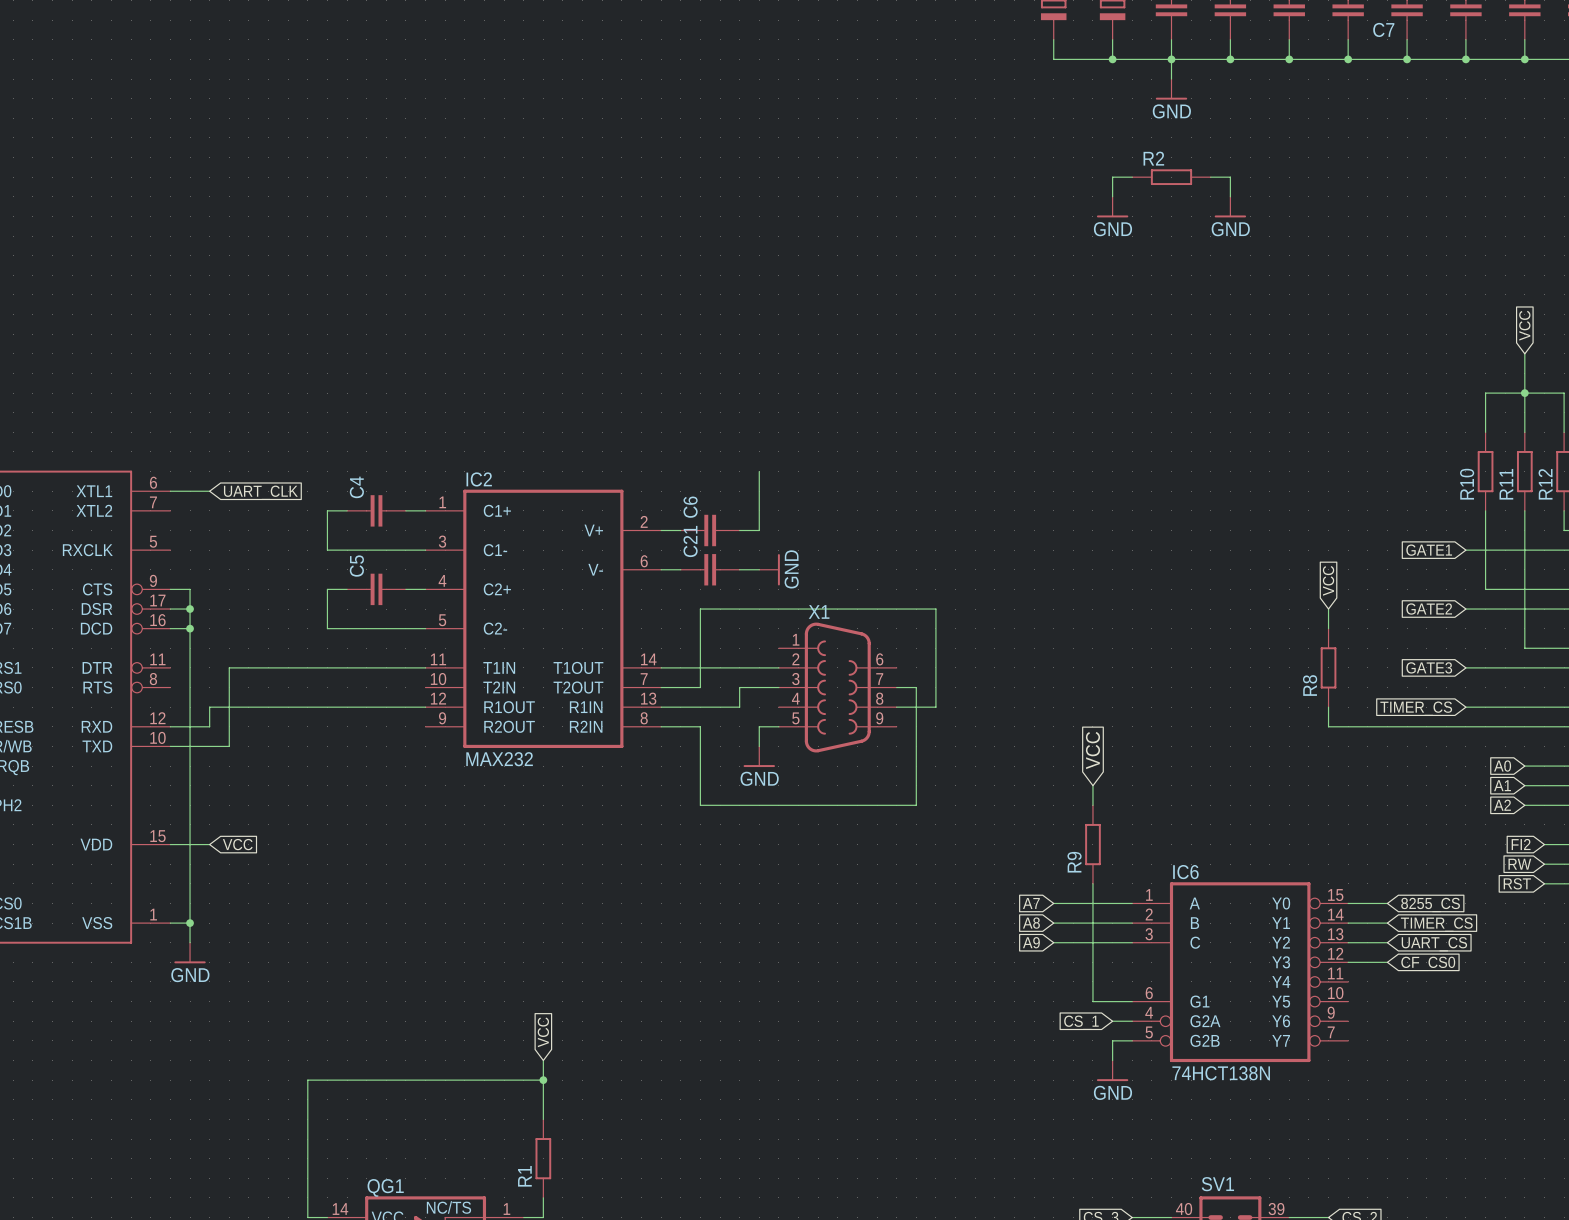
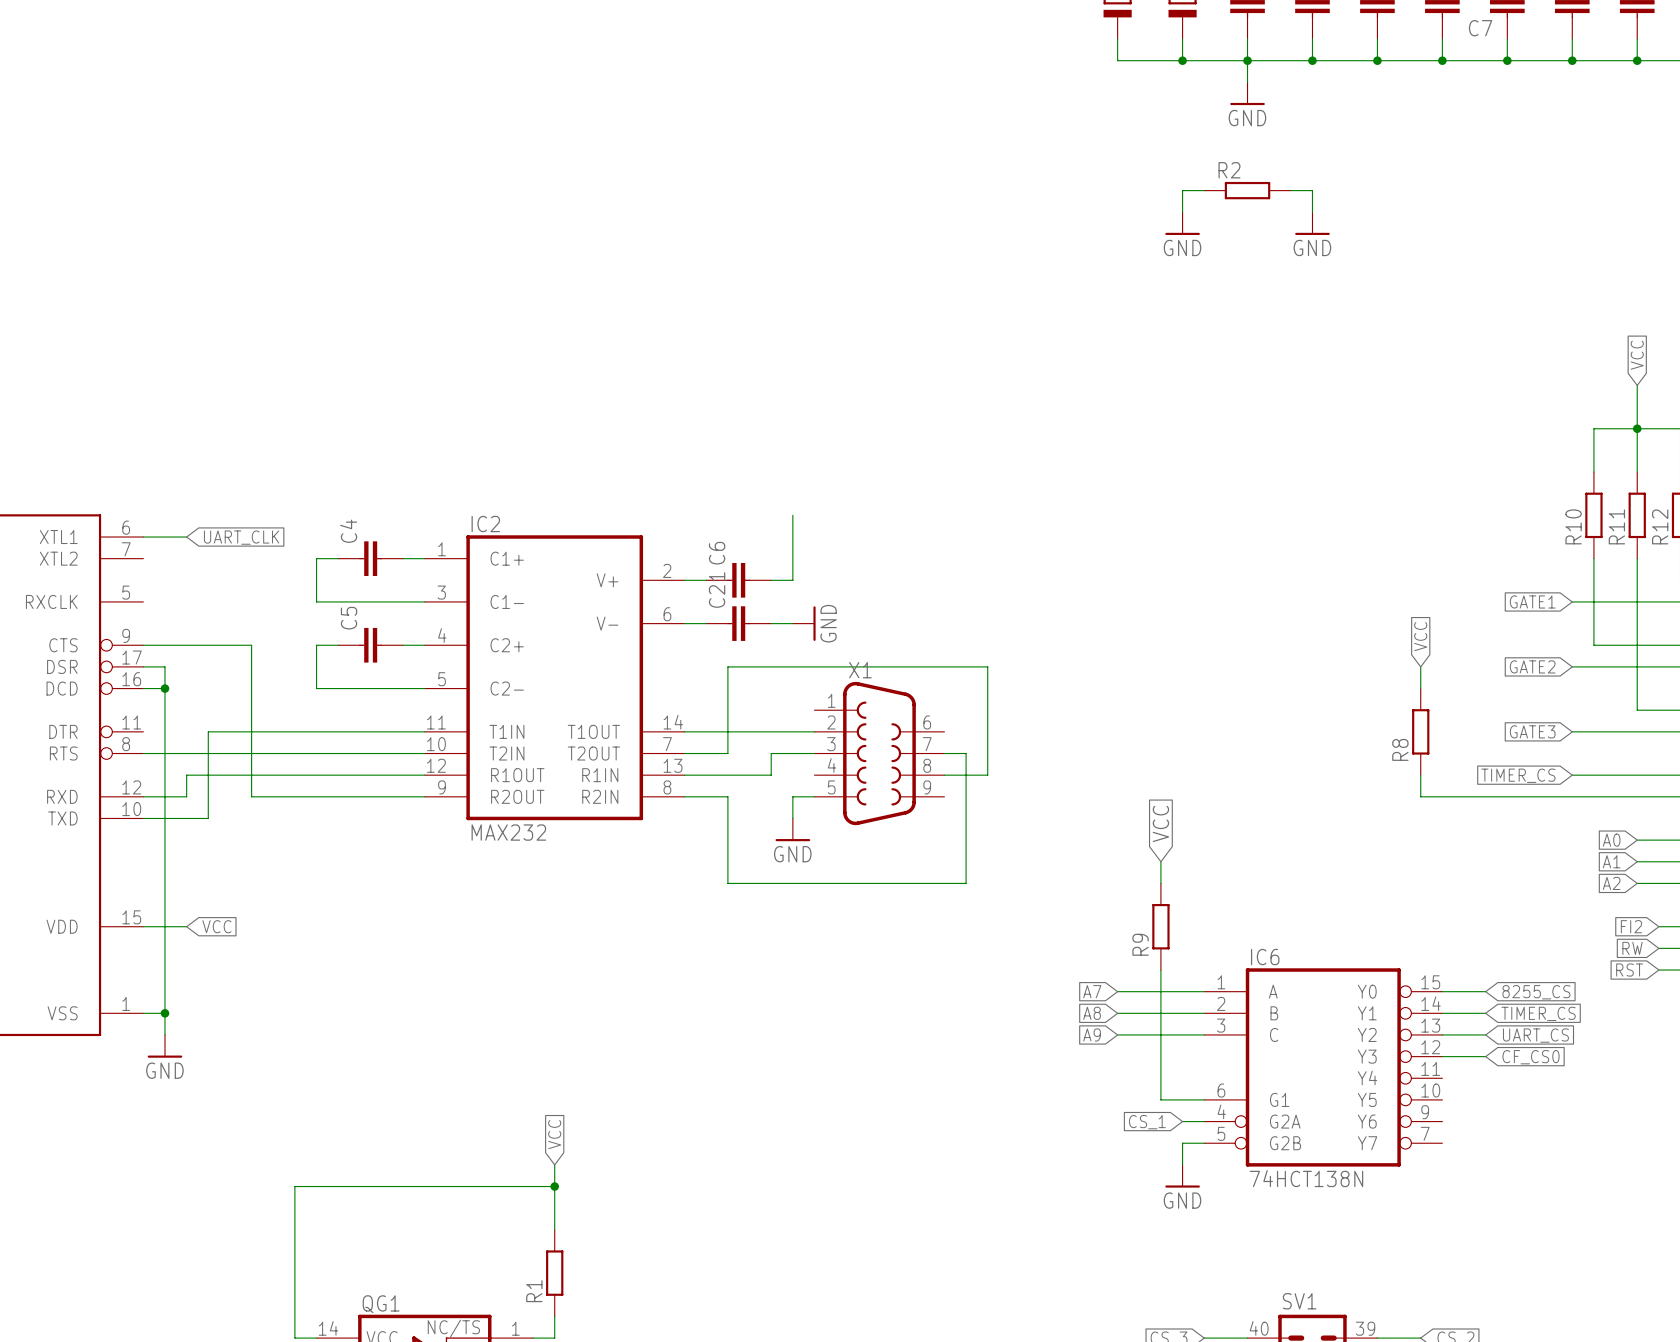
wire: (190, 589) (190, 609) -> (165, 645) (251, 645) (251, 796) (424, 796)
junction: (190, 609) -> none
wire: none -> (143, 753) (424, 753)

